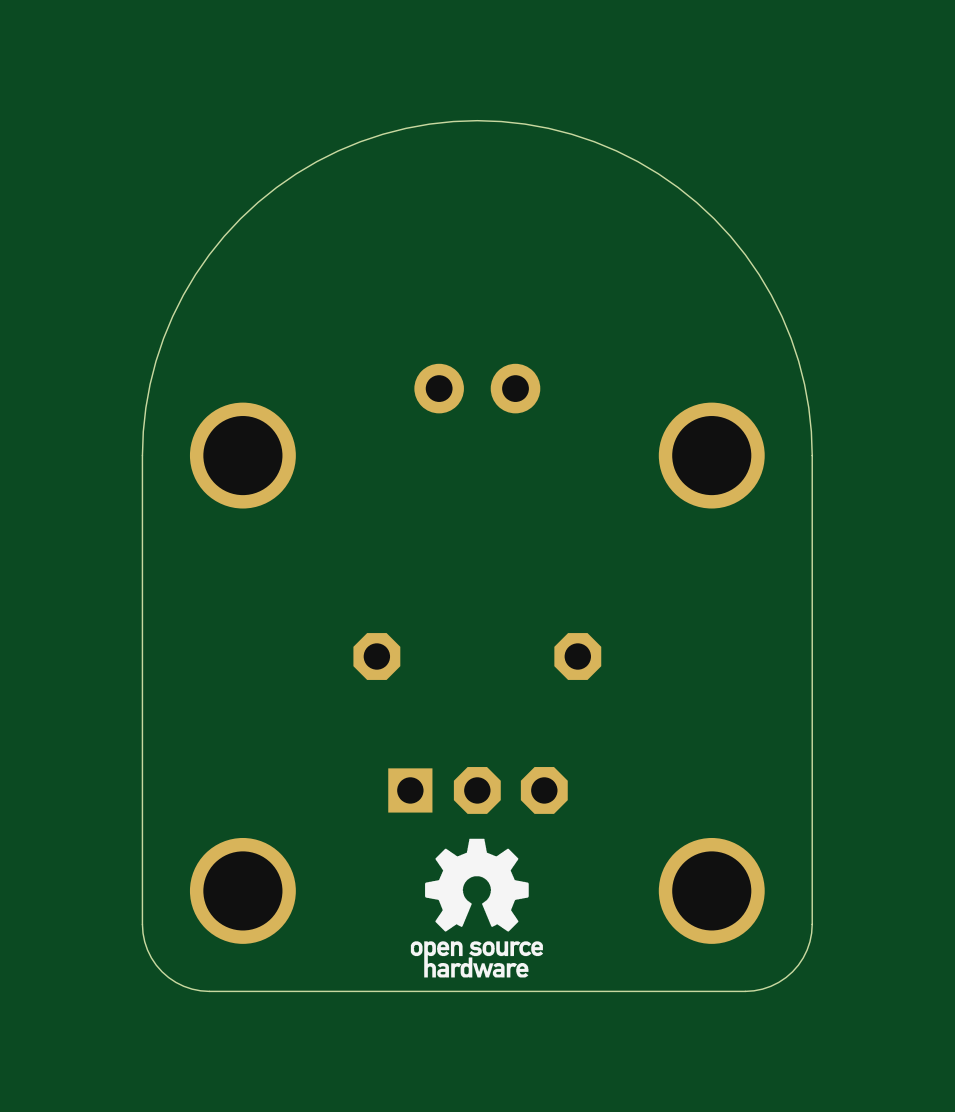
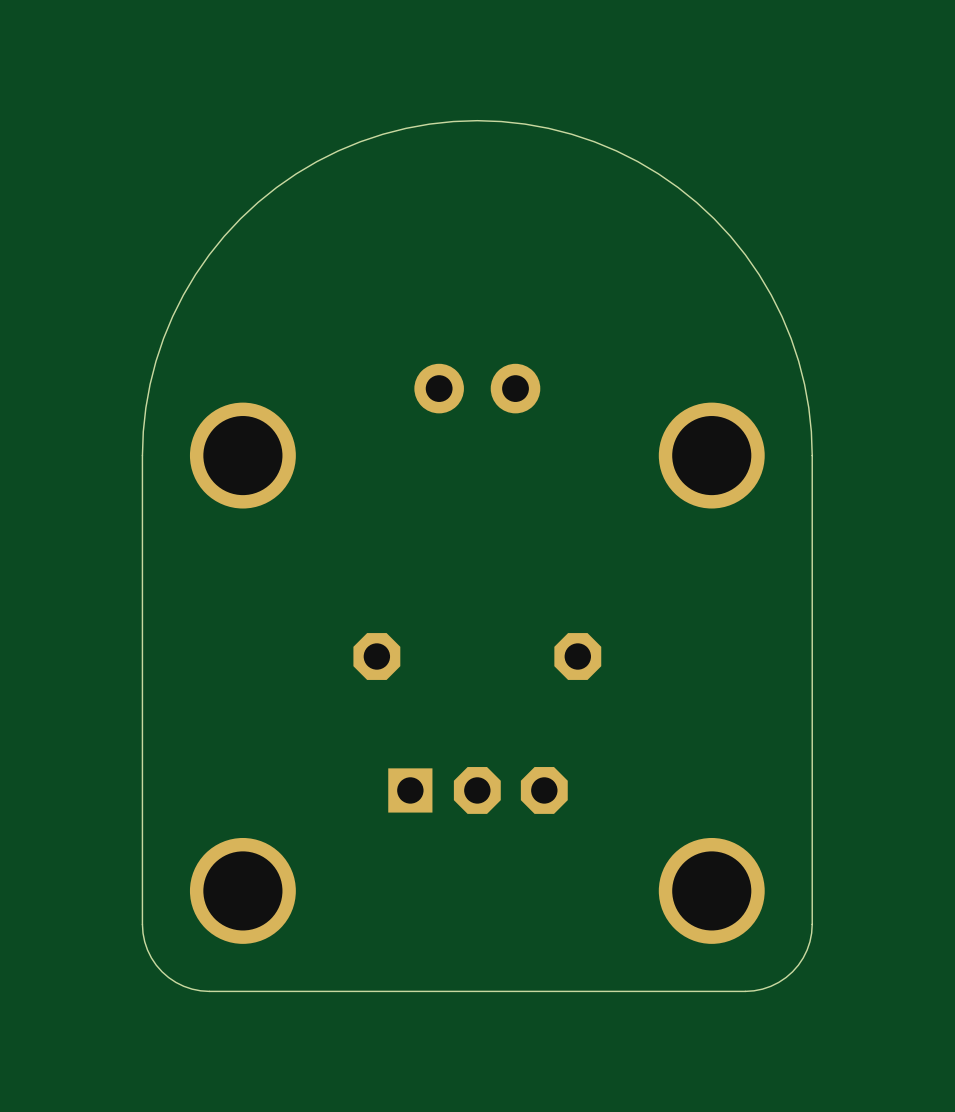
drawing: [410, 838, 543, 978] -> none

